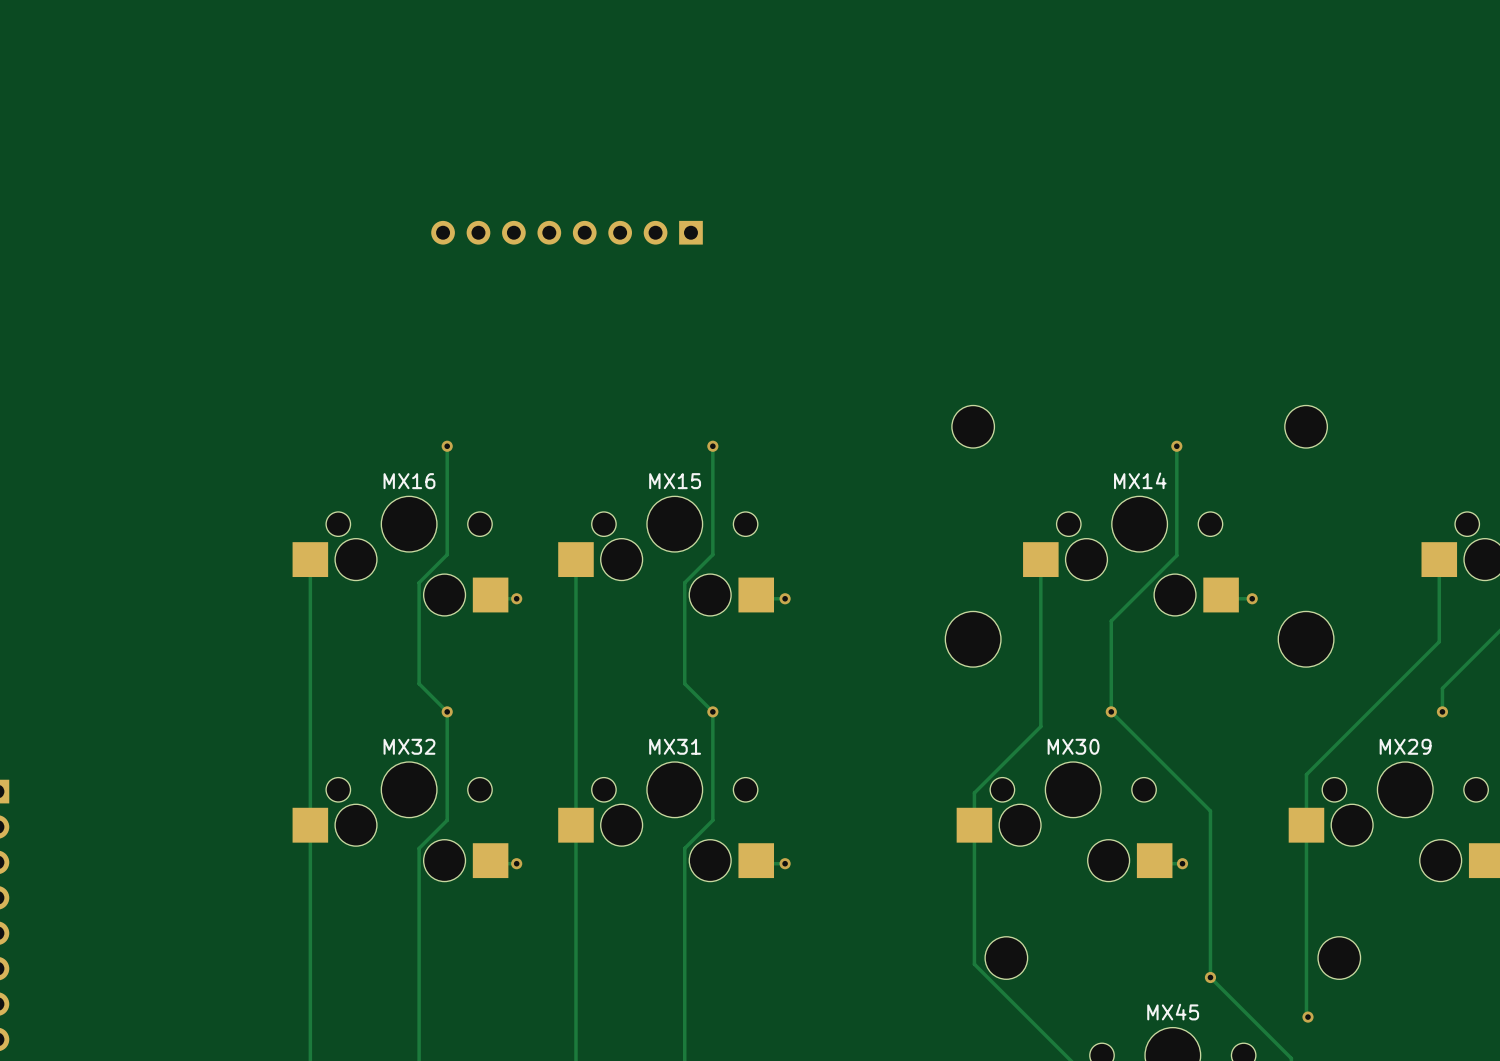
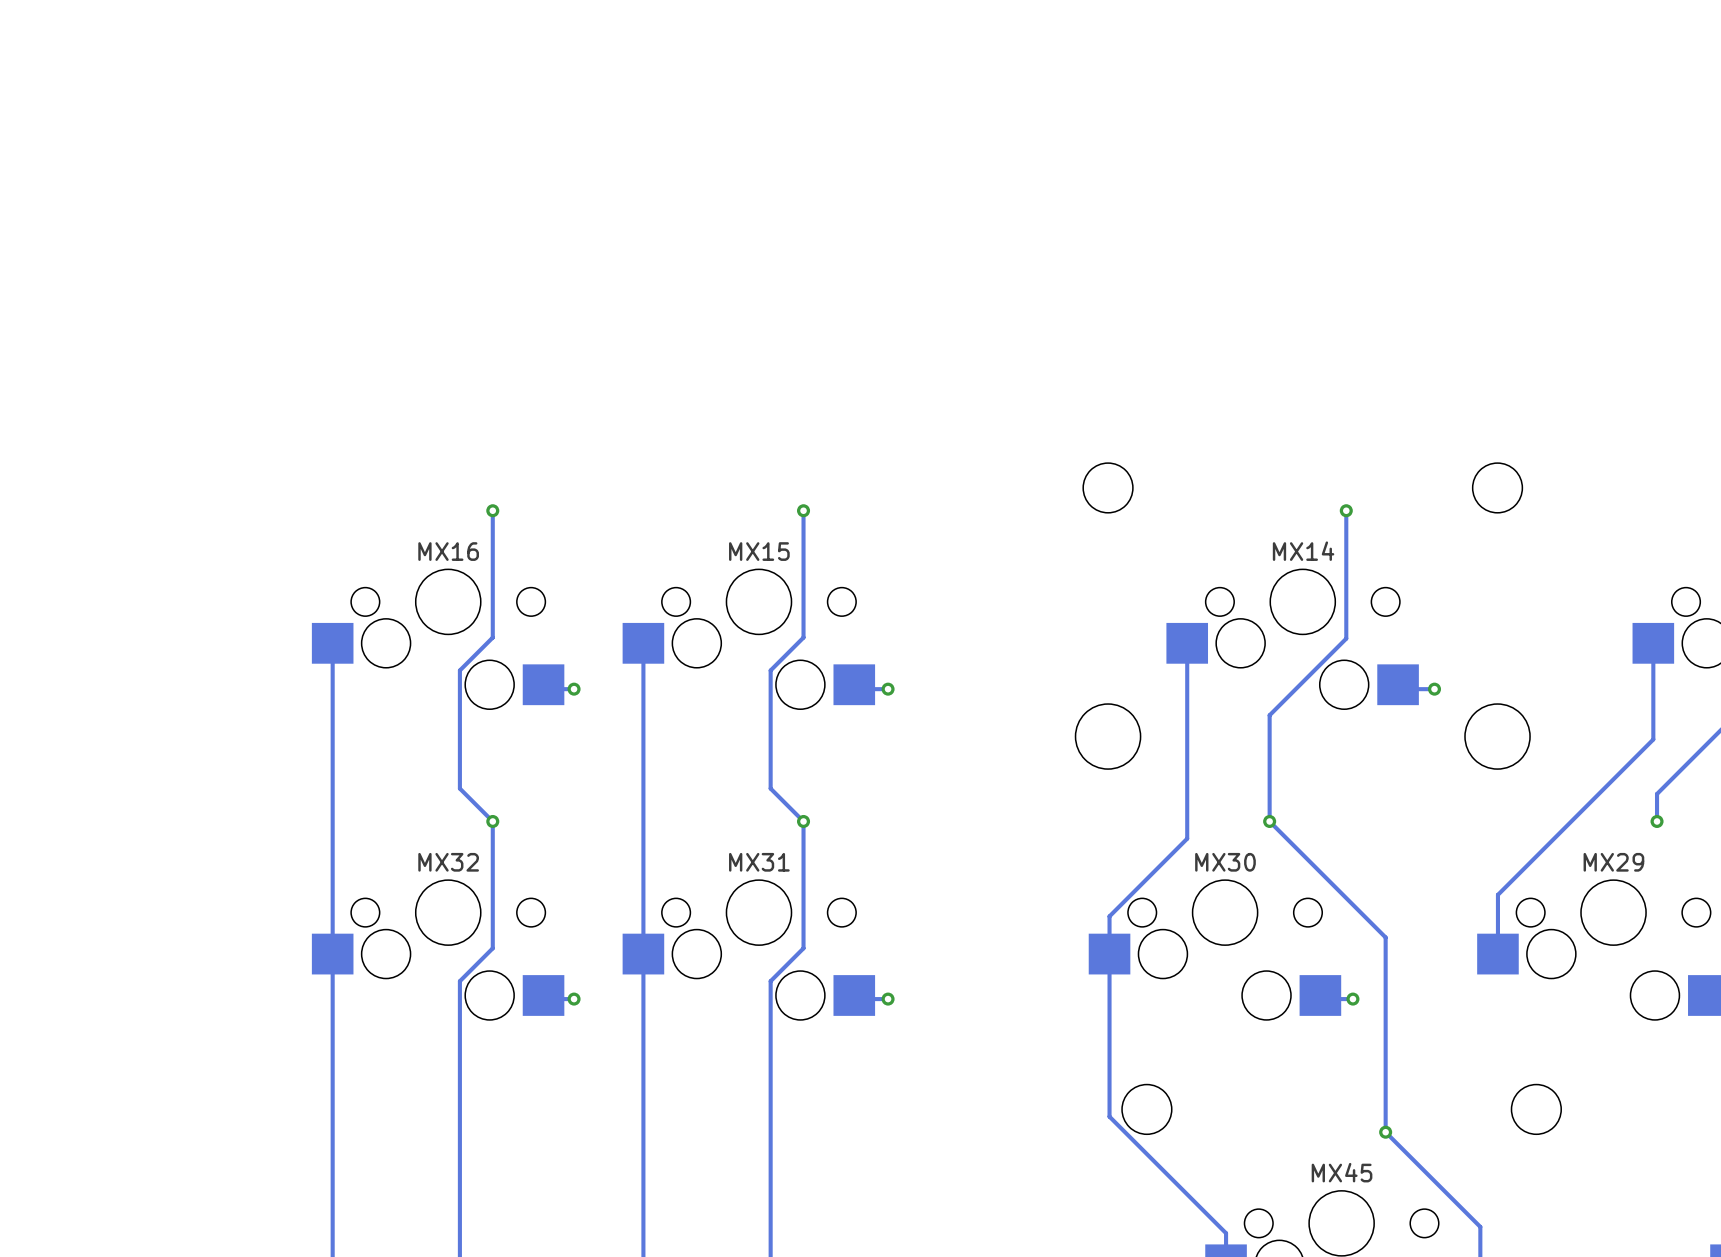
part: (567, 232) -> none
track: (1306, 825) (1306, 1015) (1308, 1017) -> none
via: (1308, 1017) -> none

